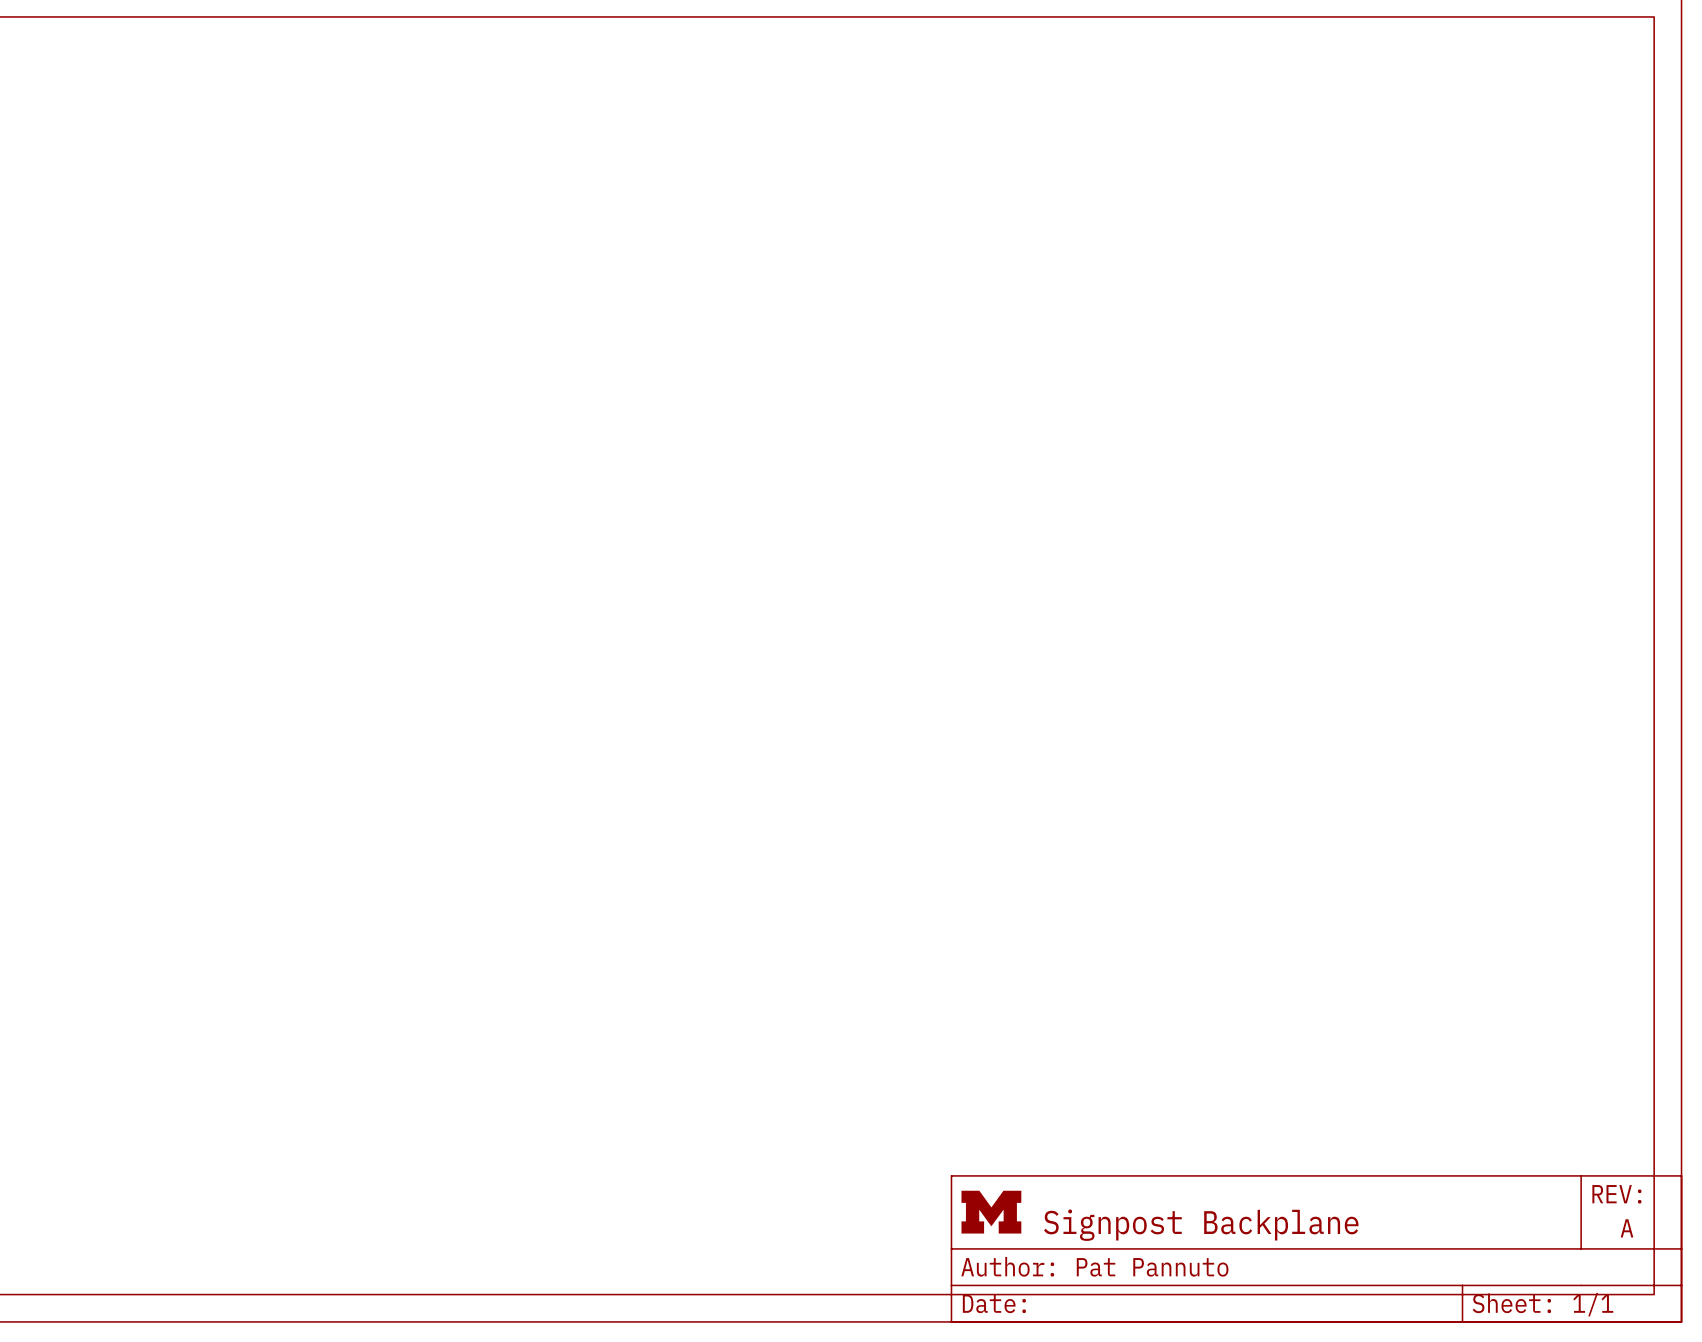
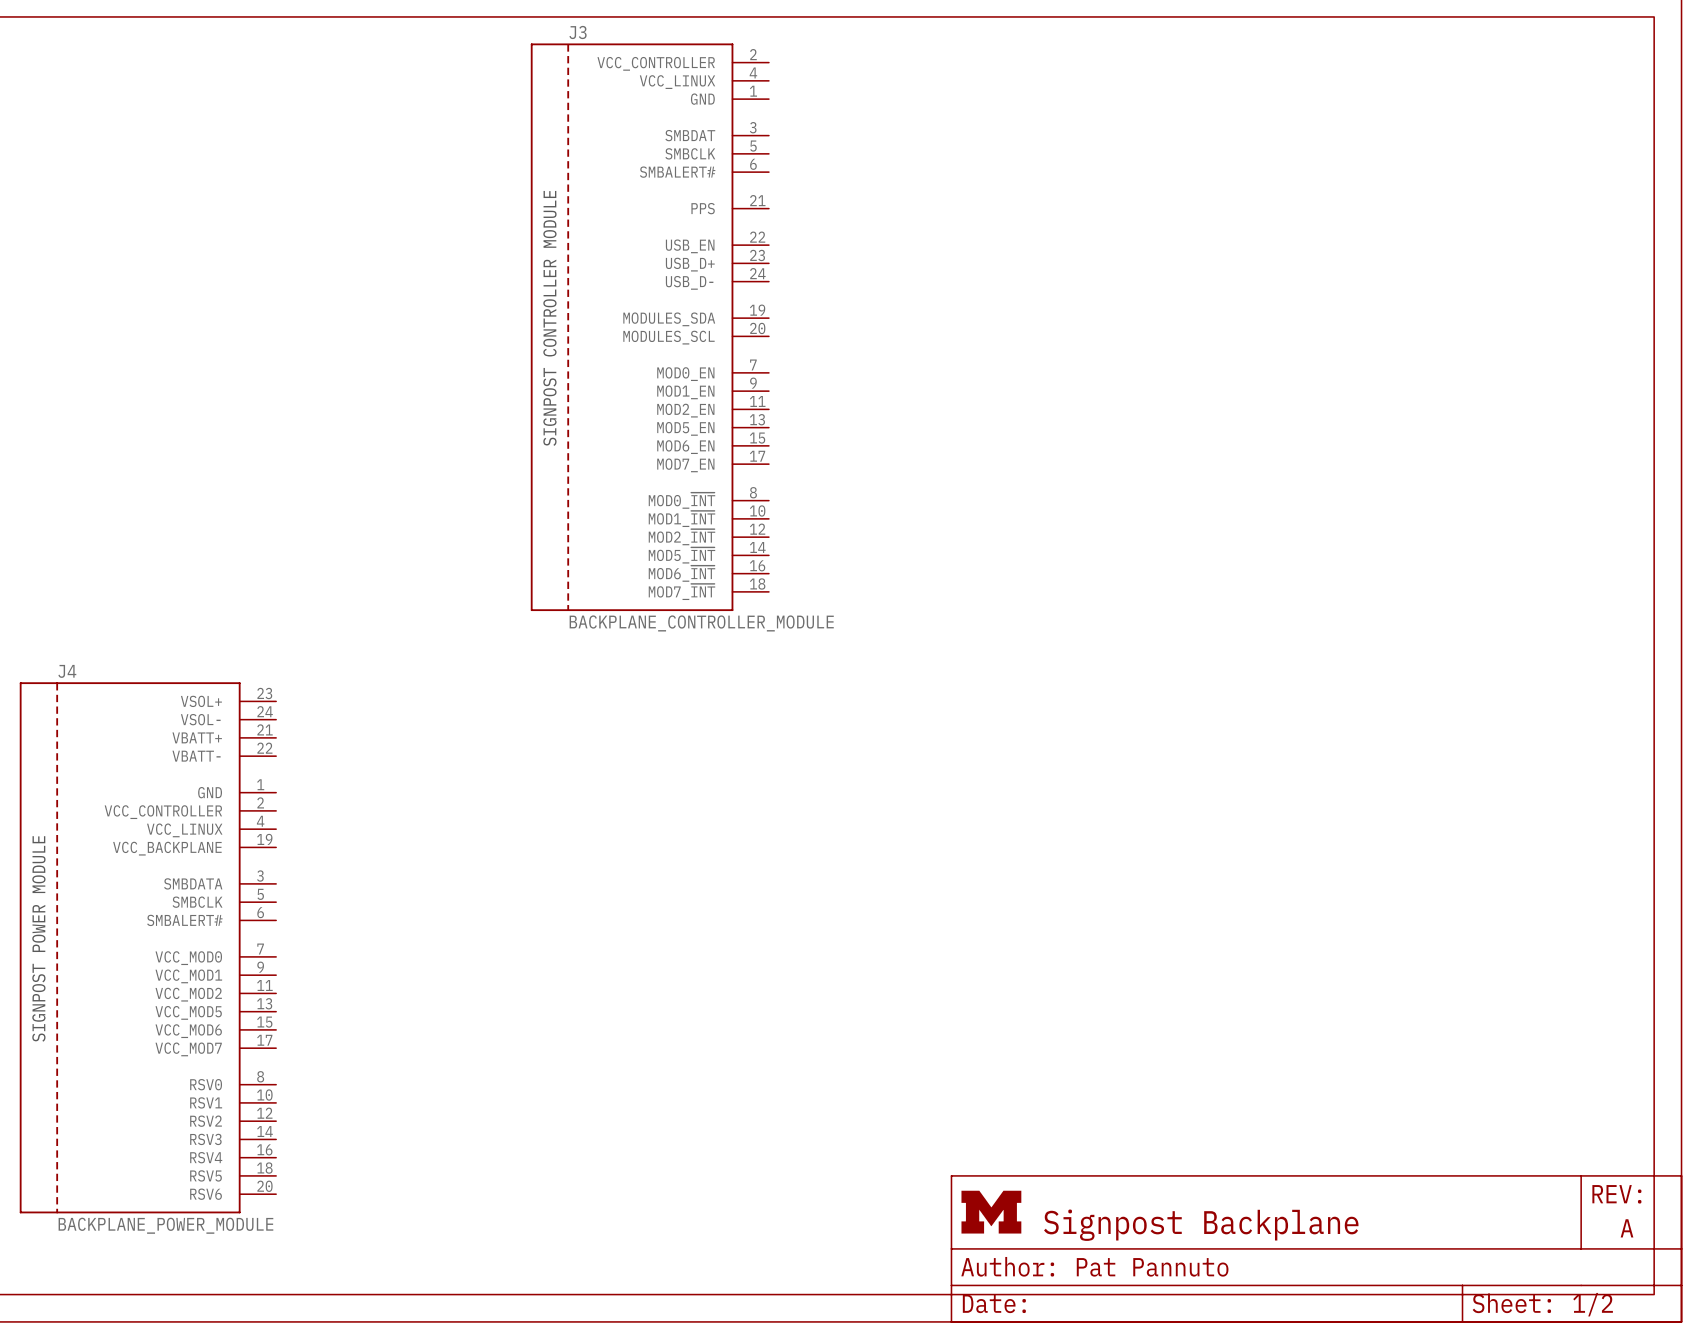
J3: none -> BACKPLANE_CONTROLLER_MODULE (649, 327)
J4: none -> BACKPLANE_POWER_MODULE (147, 947)
part text: 1/1 (1593, 1304) -> 1/2 (1593, 1304)

